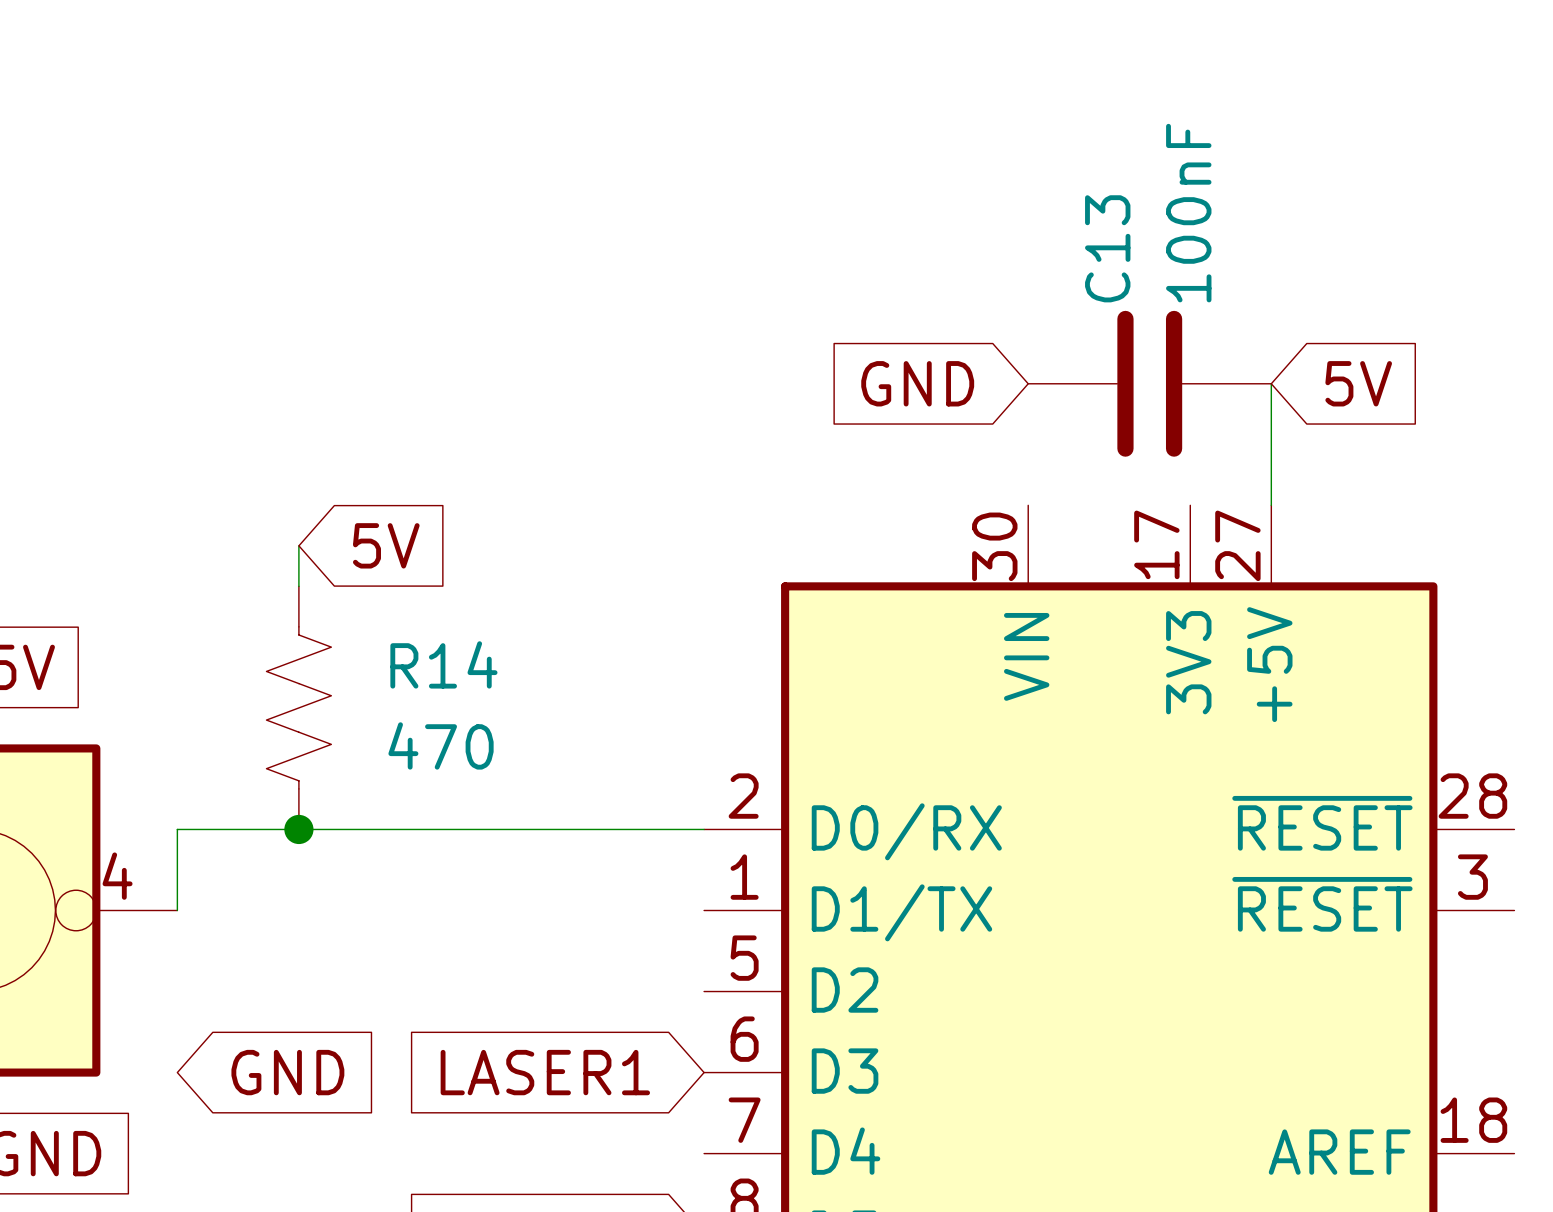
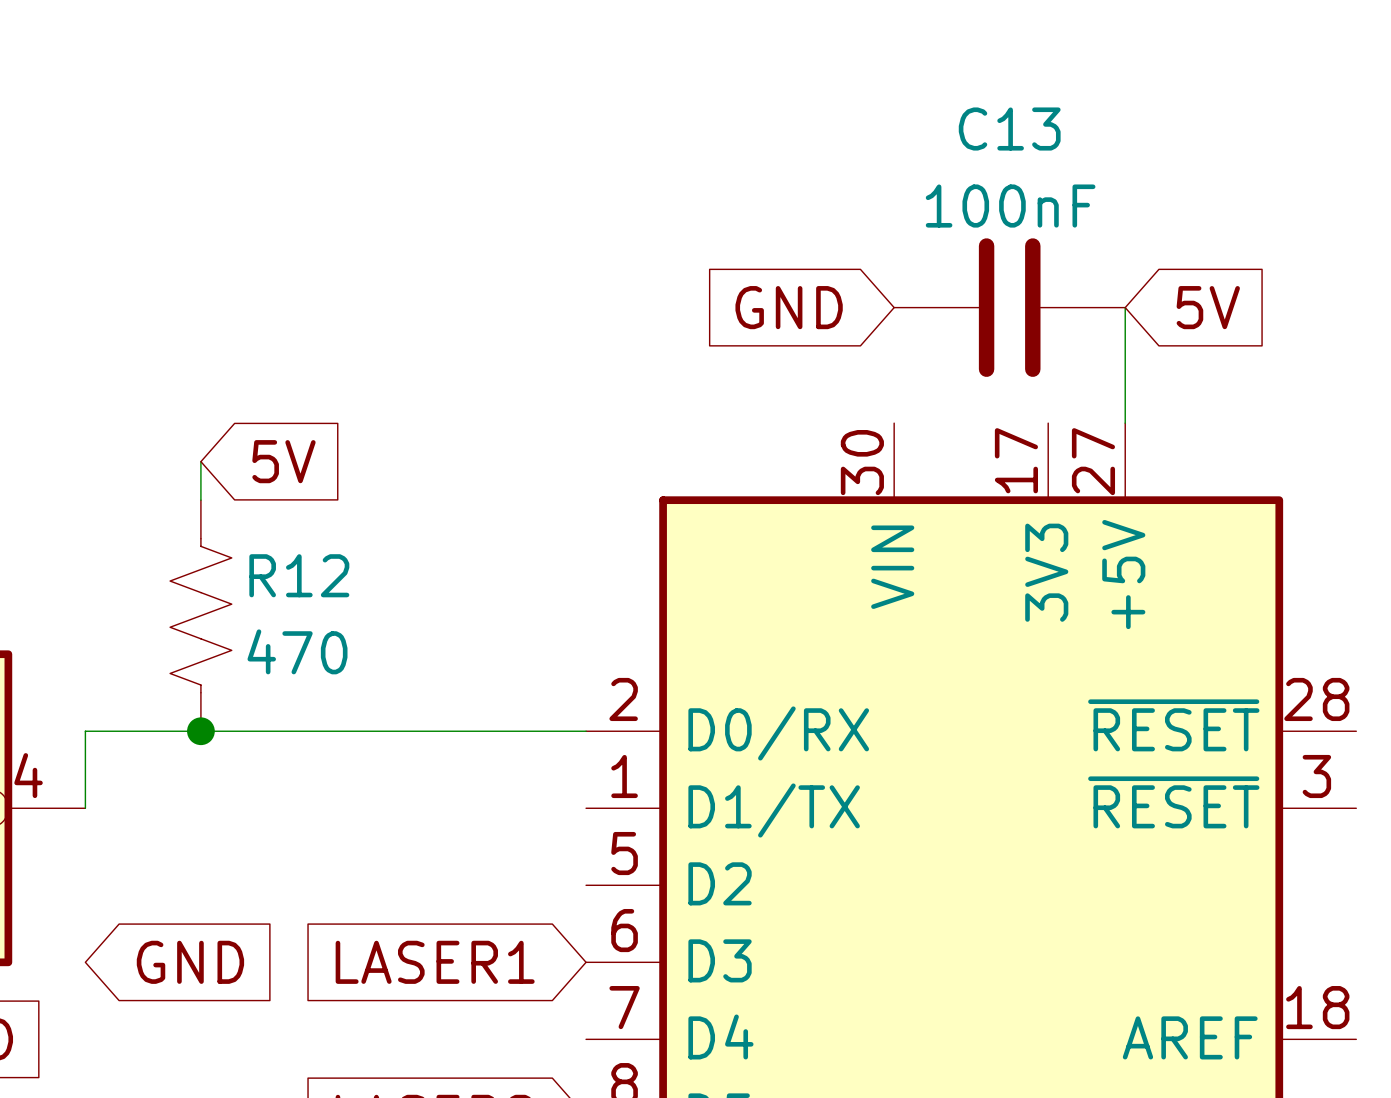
C13 value rotation: 0° (1188, 213) -> 90° clockwise (1010, 206)
C13 name rotation: 0° (1107, 248) -> 90° clockwise (1009, 129)
R14 name: R14 (443, 664) -> R12 (299, 575)
R14 value position: 470 (441, 745) -> 470 (297, 651)

